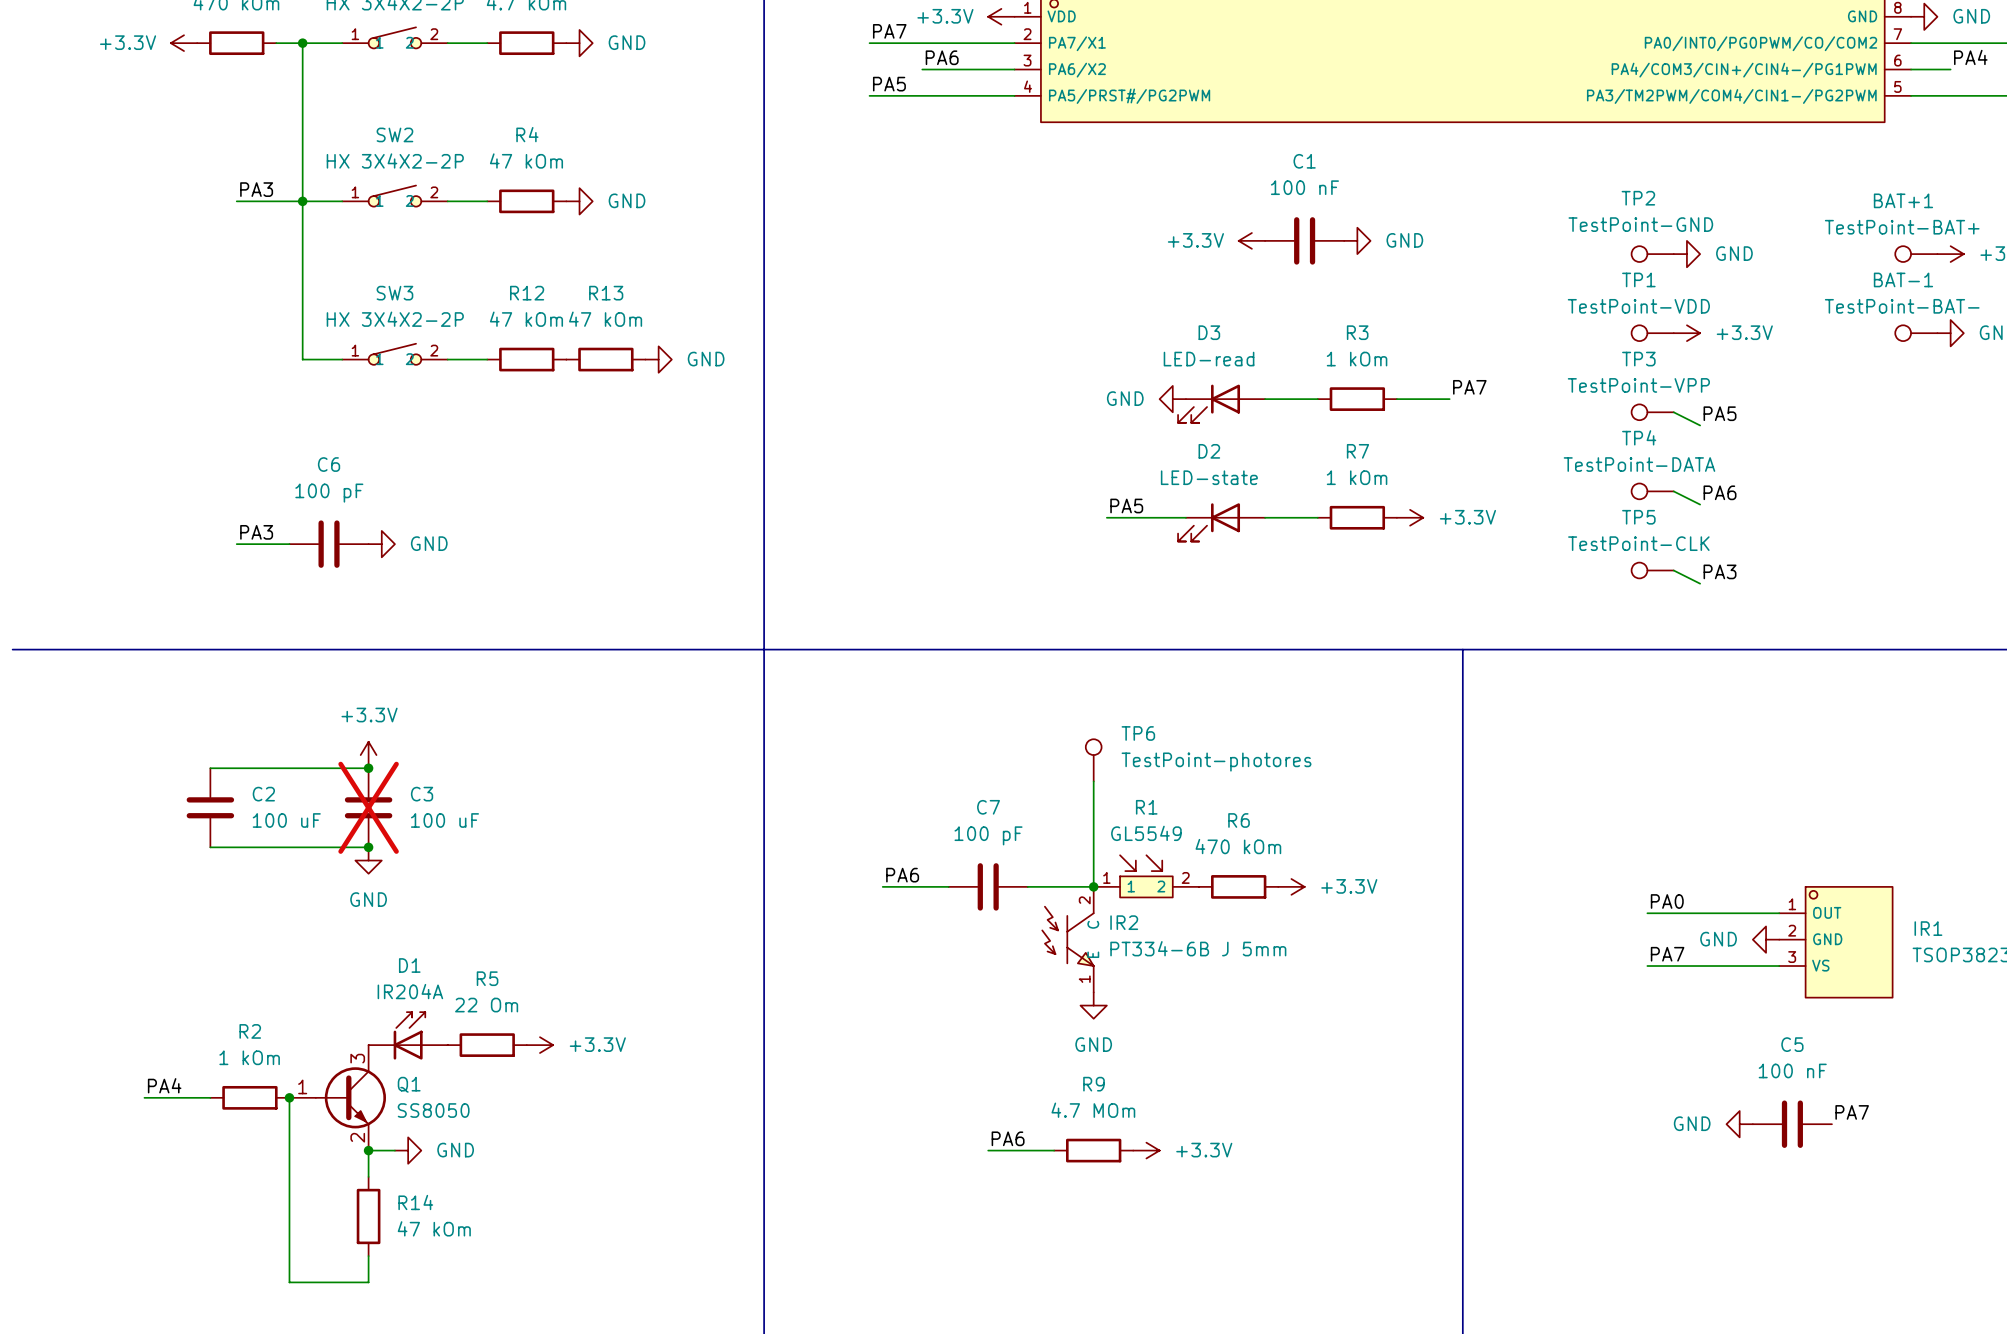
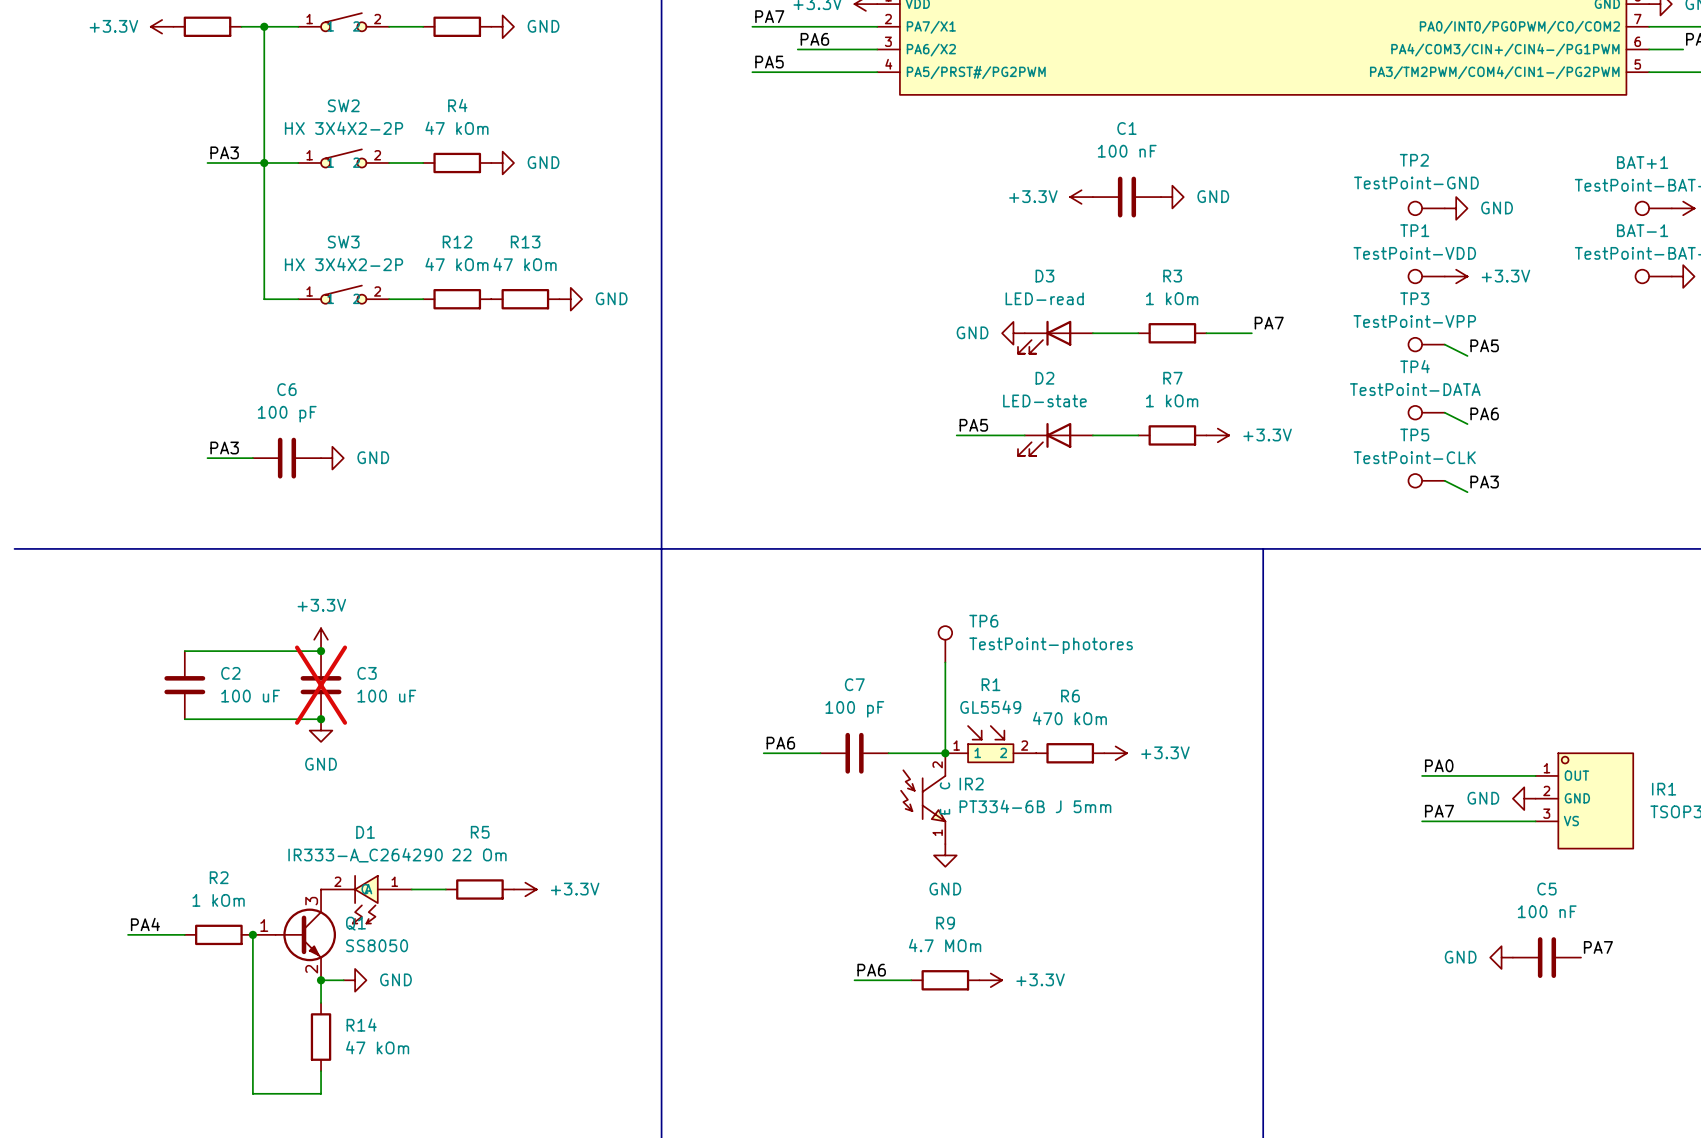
D1 value: IR204A (410, 991) -> IR333-A_C264290 (365, 855)
D1 symbol: [368, 1012, 448, 1060] -> [321, 875, 412, 924]
wire: none -> (411, 889) (445, 889)
R5 position: (487, 1045) -> (479, 889)
power symbol position: +3.3V (539, 1045) -> +3.3V (525, 889)

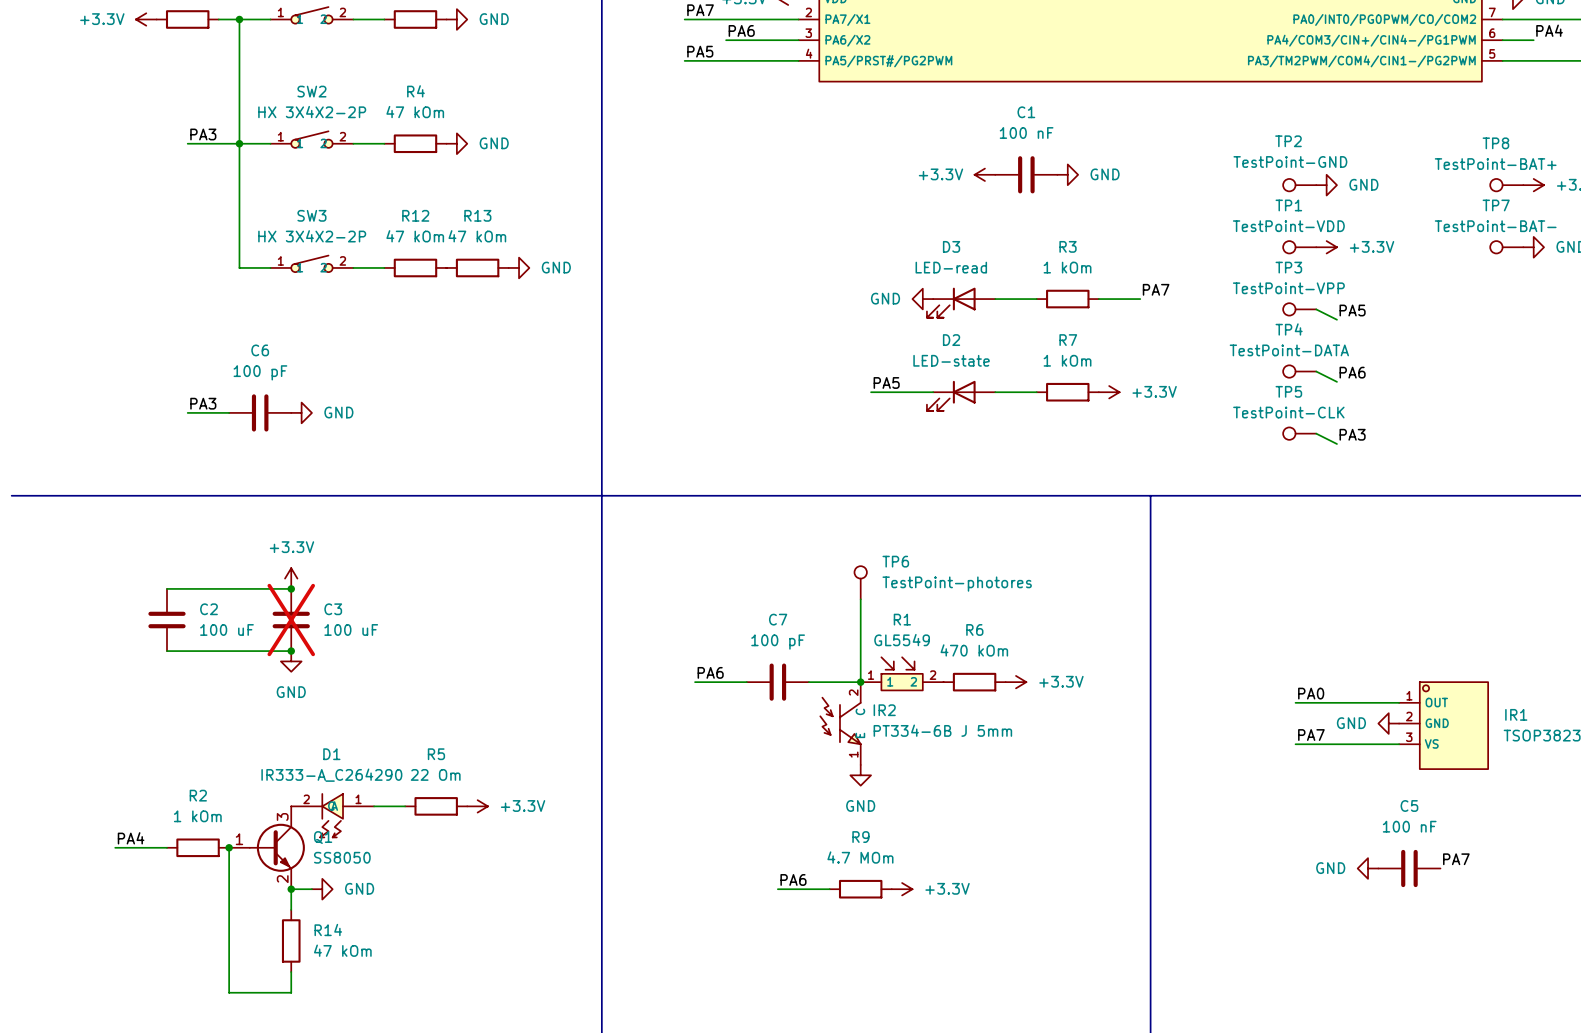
BAT+1 name: BAT+1 (1642, 162) -> TP8 (1495, 143)
BAT-1 name: BAT-1 (1642, 230) -> TP7 (1496, 205)

